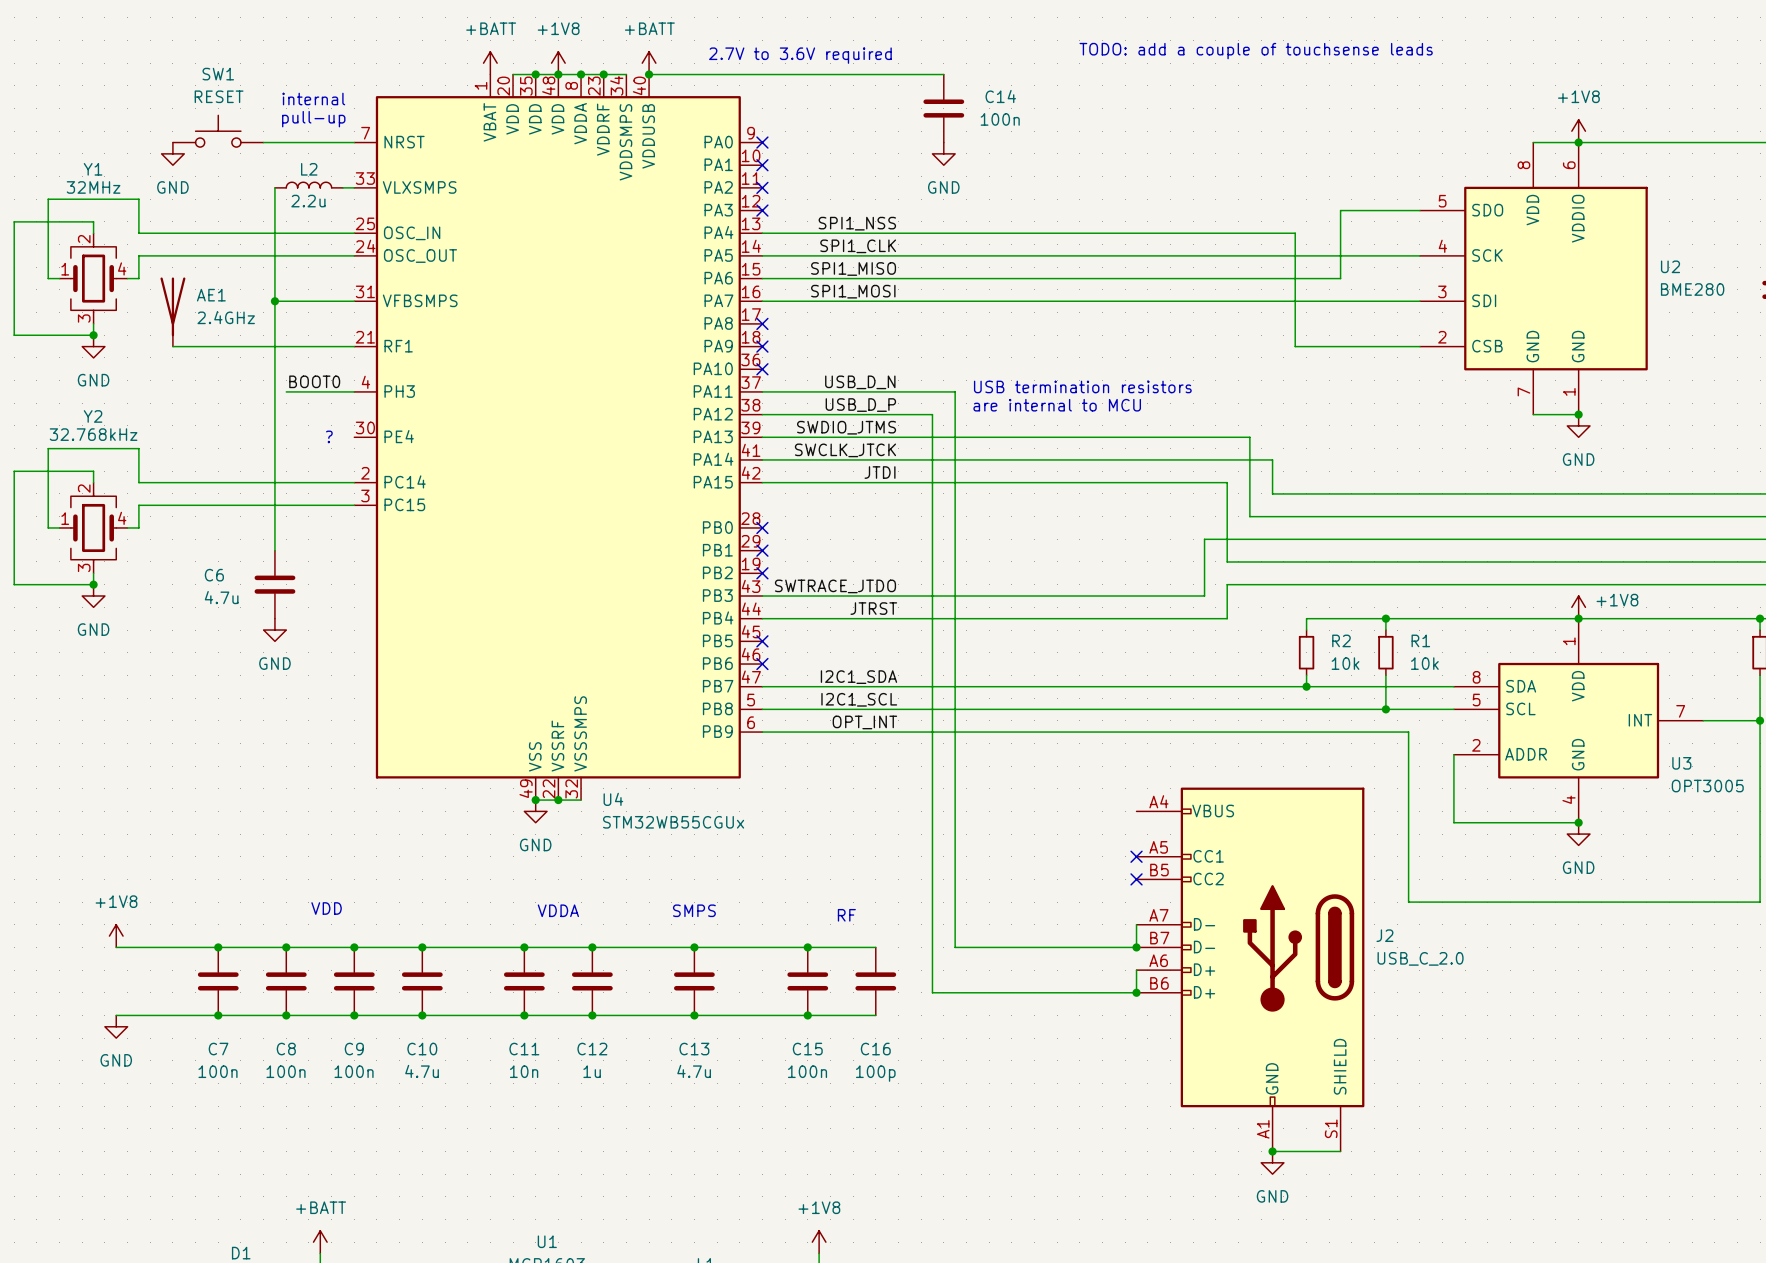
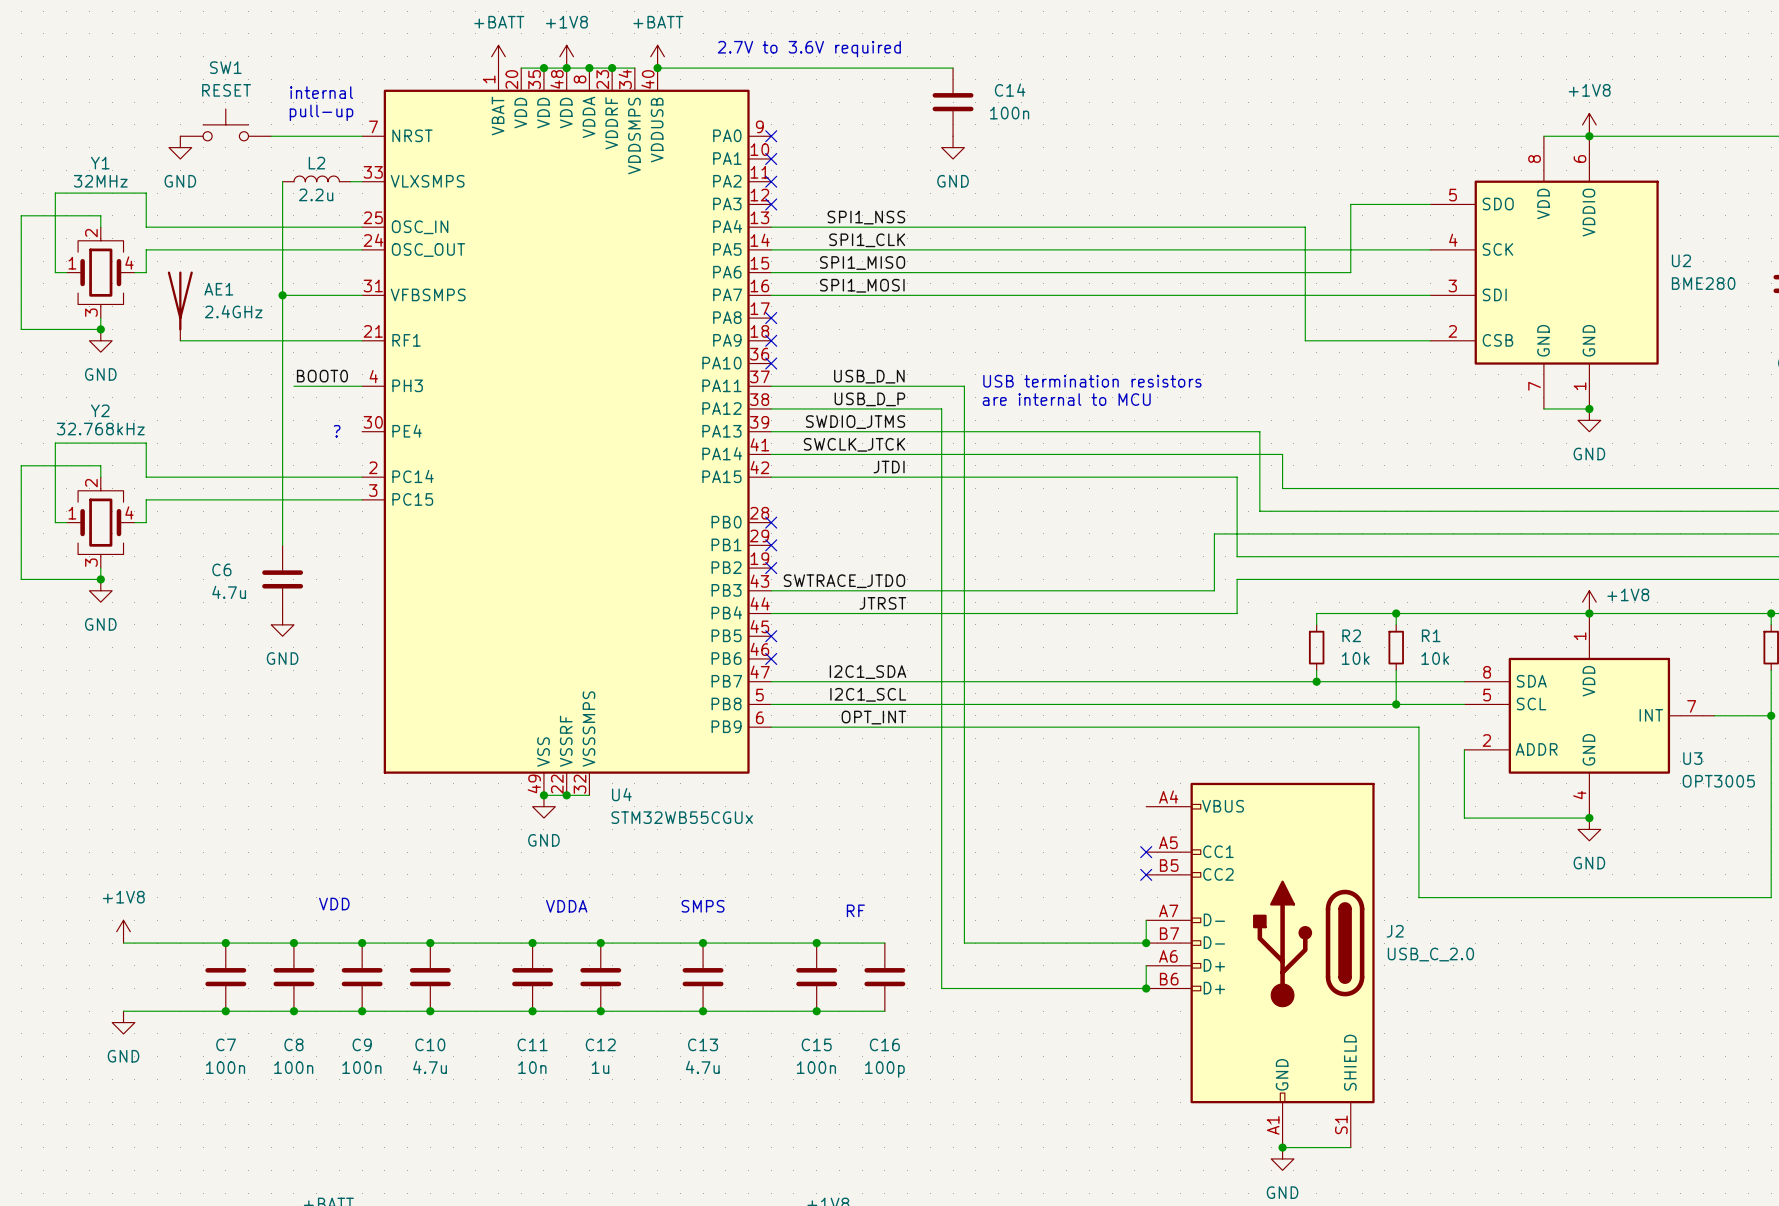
text: TODO: add a couple of touchsense leads (1256, 51) -> none

